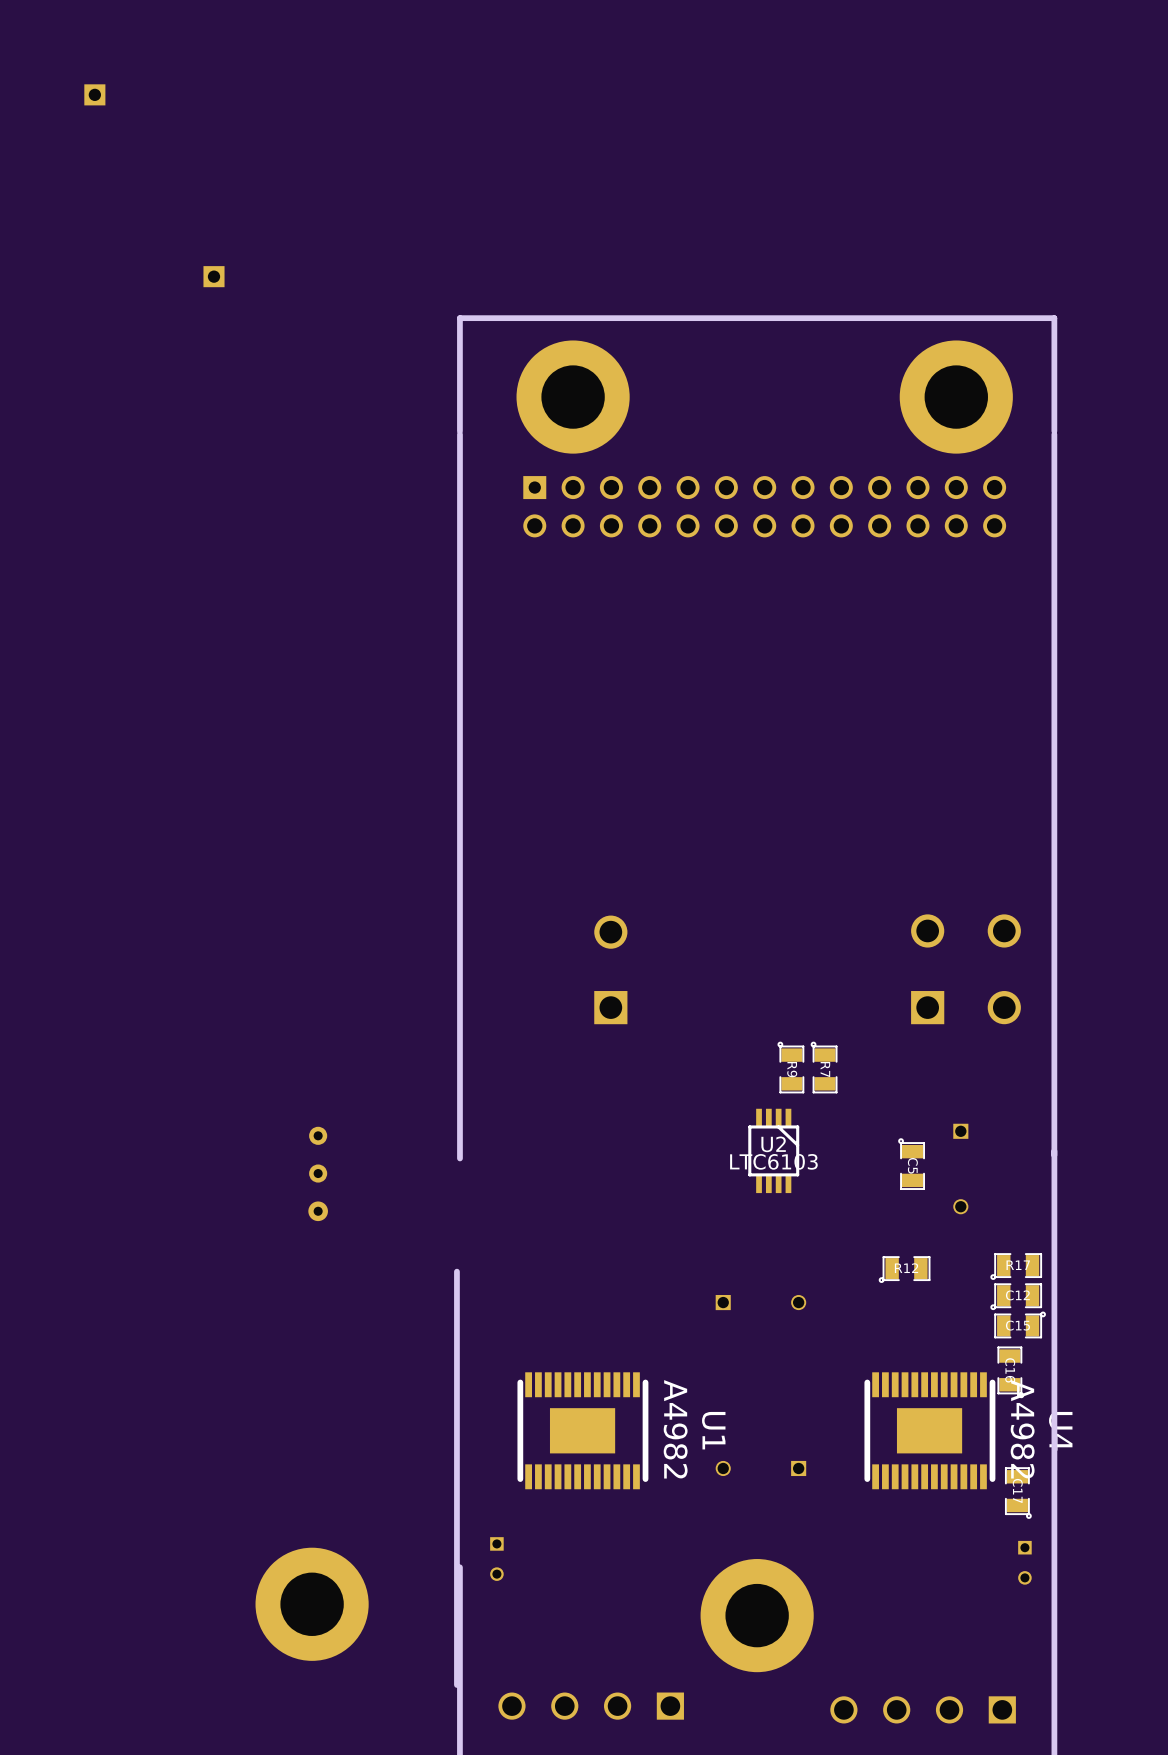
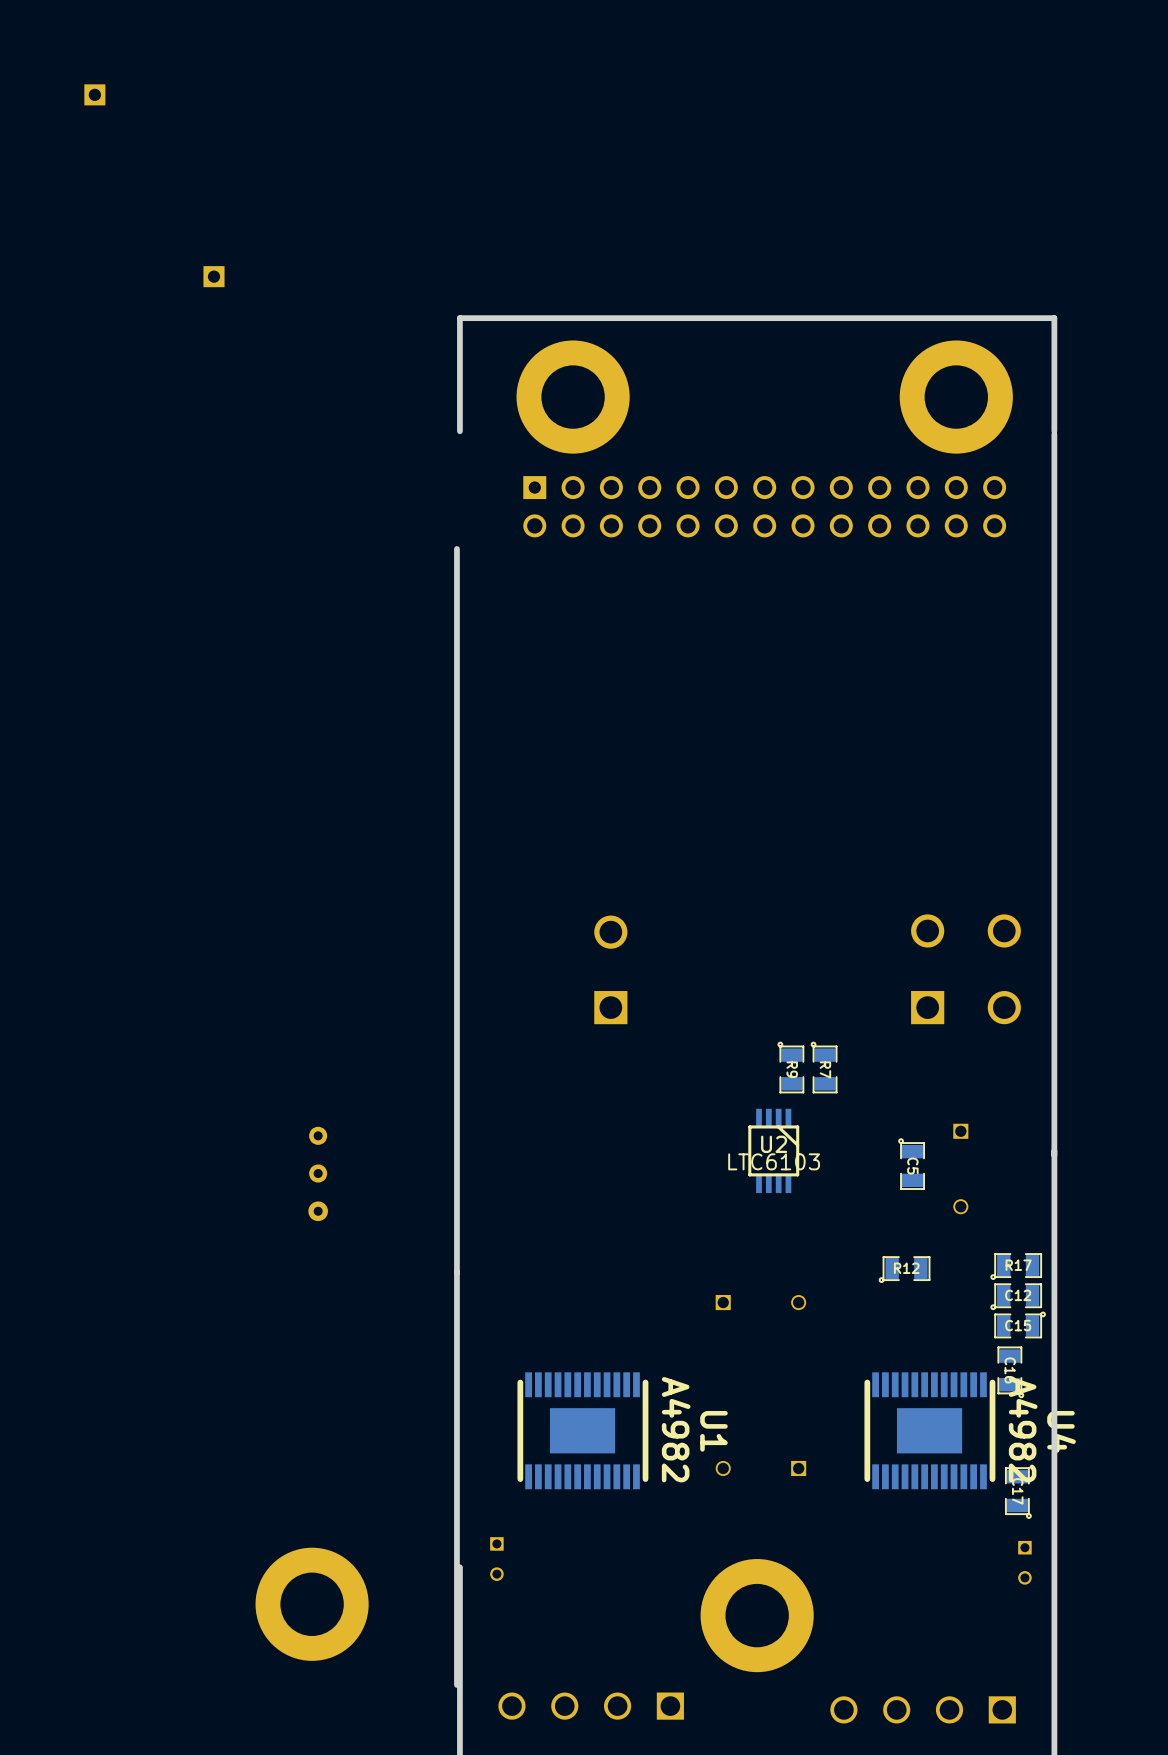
board edge: (459, 434) (459, 1158) -> none
board edge: none -> (456, 548) (456, 1271)

